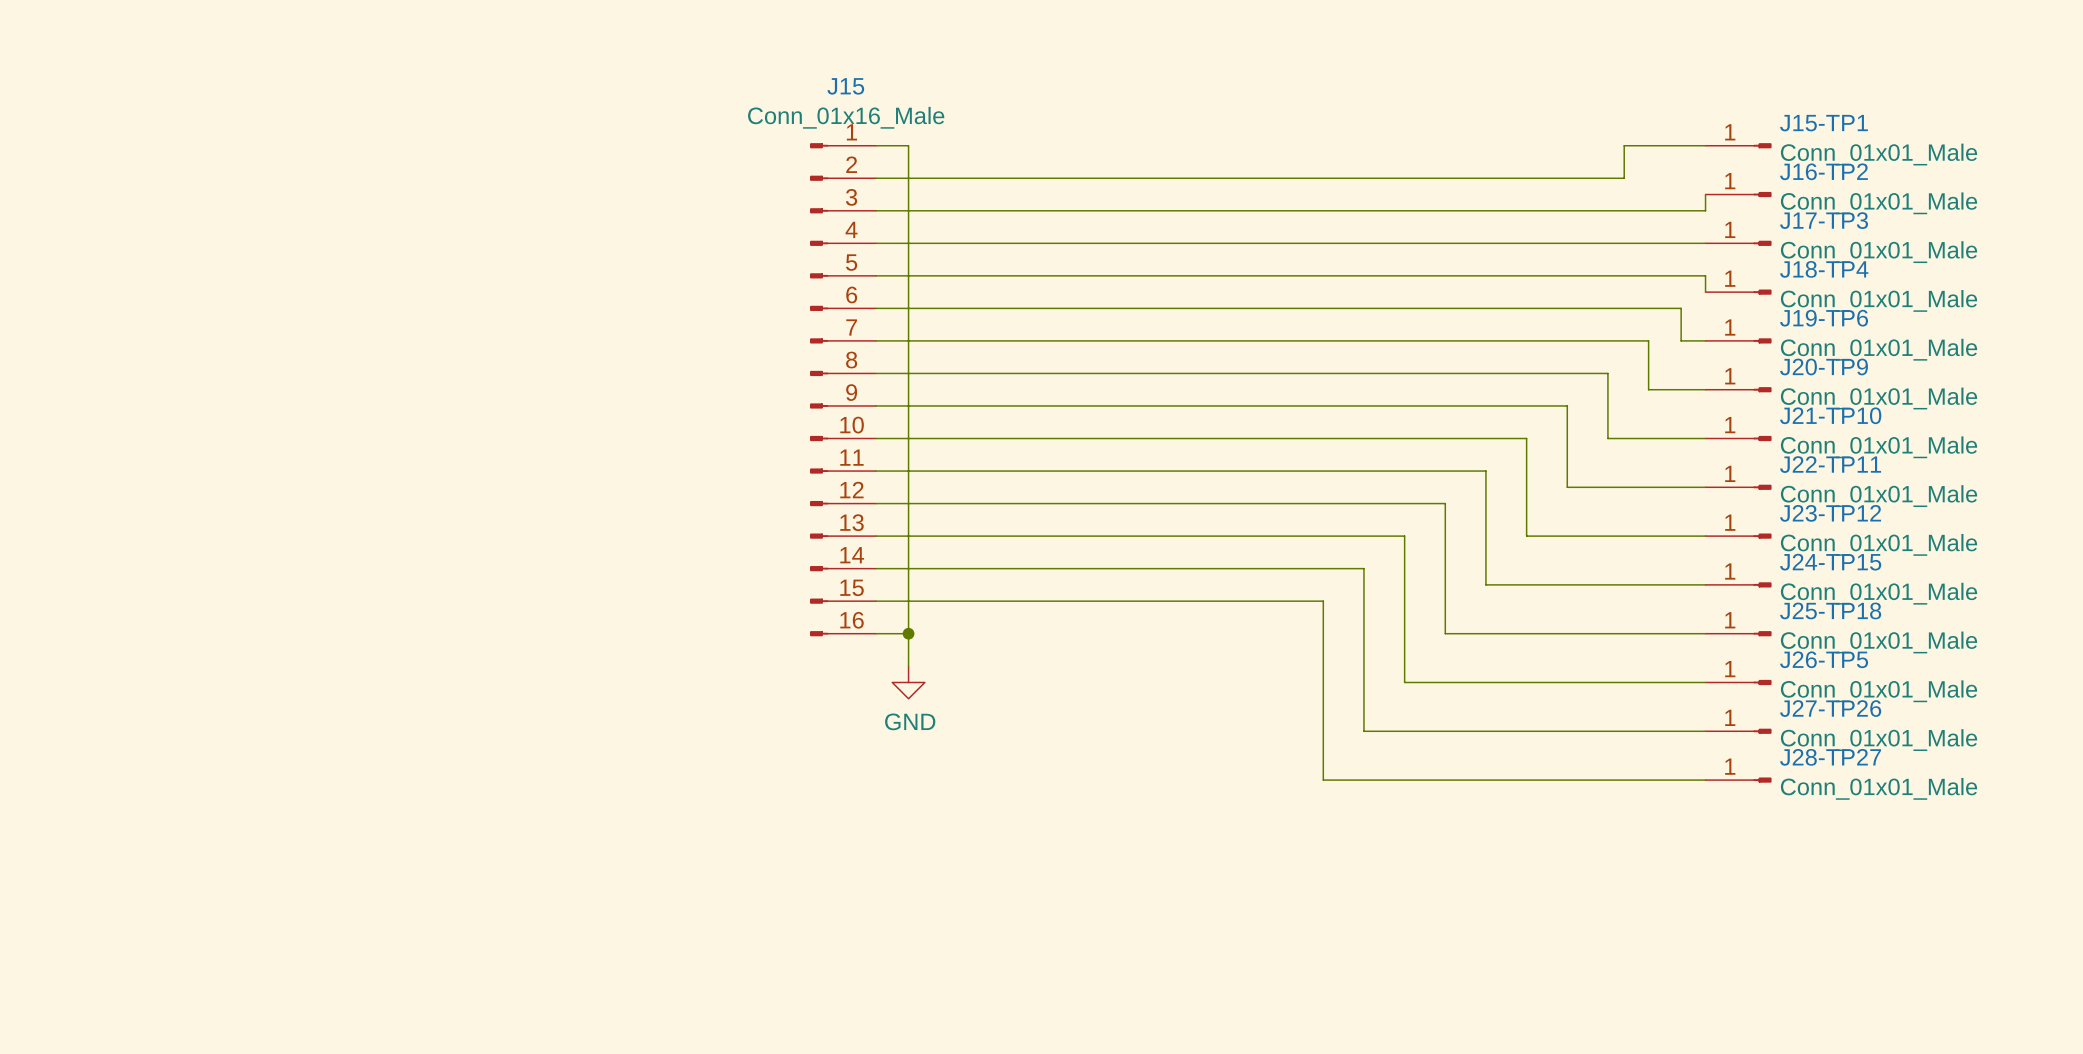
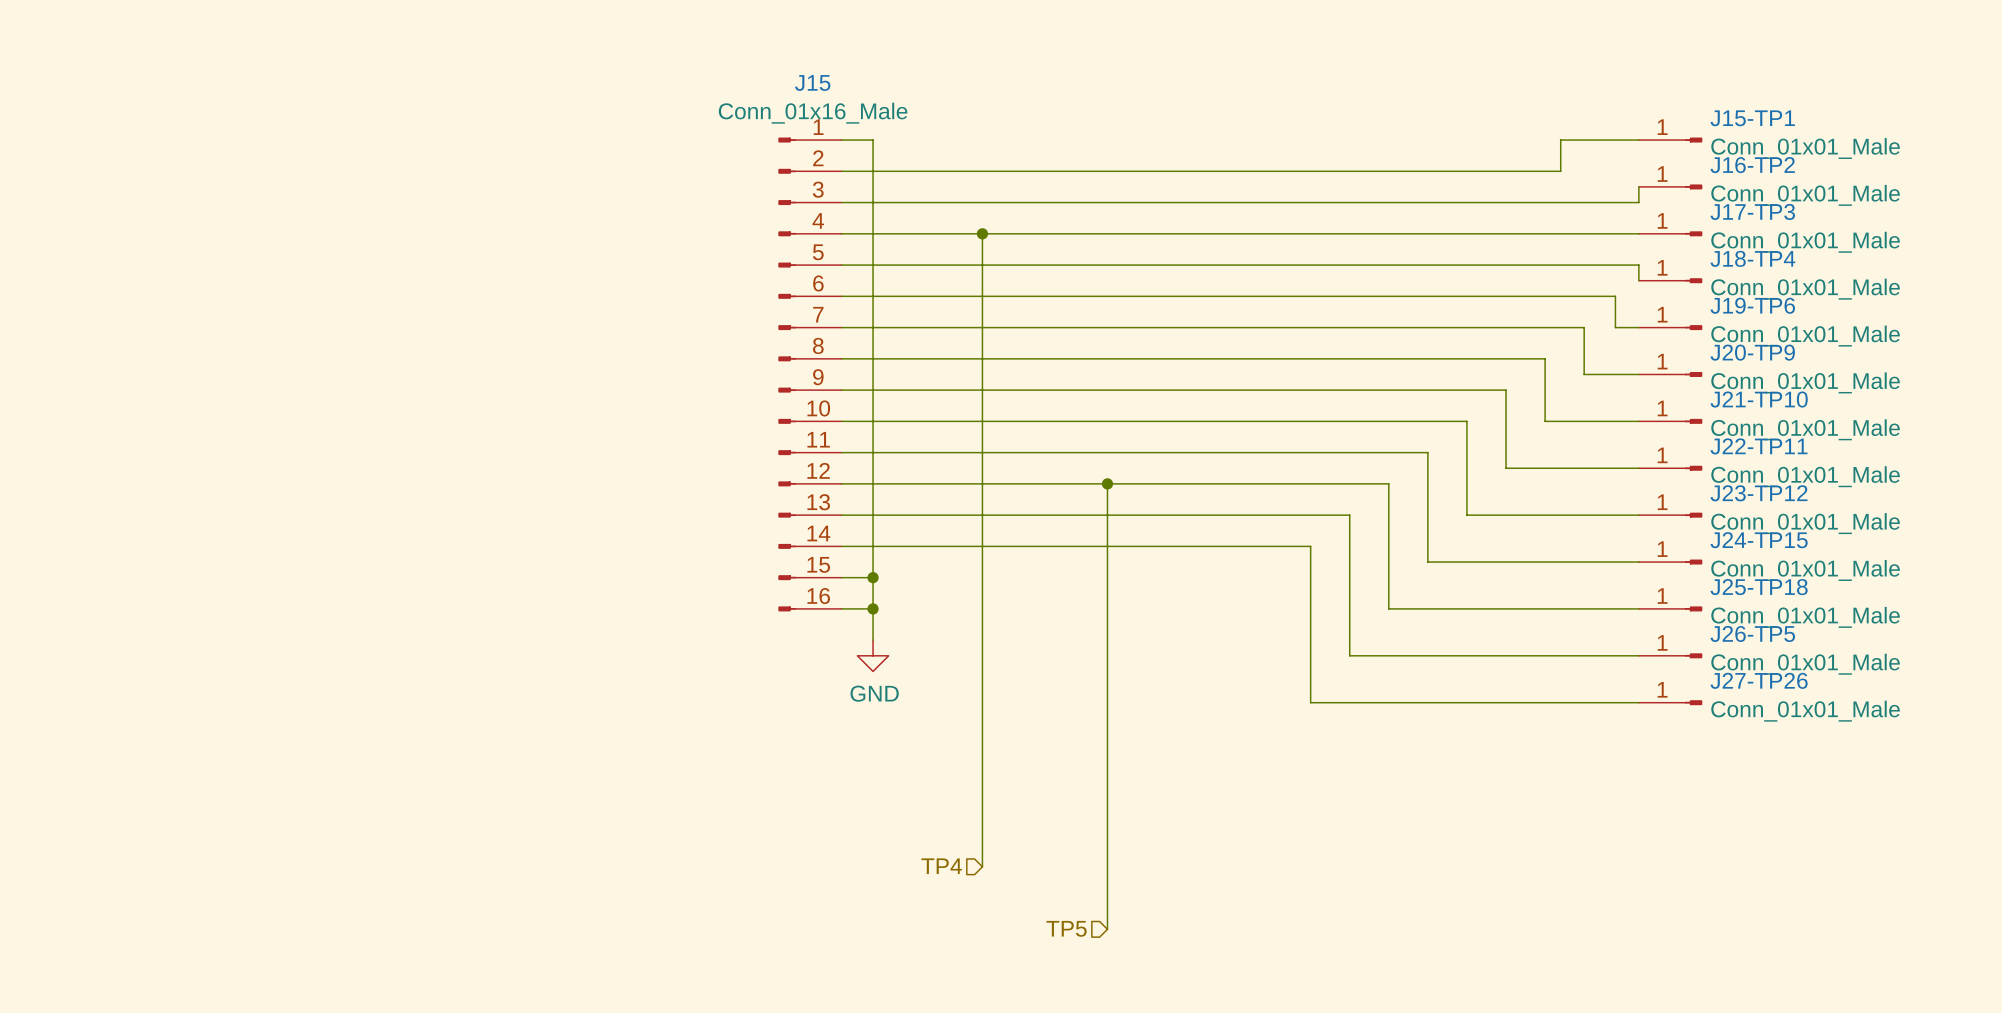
wire: none -> (982, 233) (982, 866)
junction: none -> (982, 233)
wire: none -> (1107, 483) (1107, 929)
junction: none -> (1107, 483)
wire: (908, 601) (1323, 601) (1323, 780) (1705, 780) -> none
junction: none -> (873, 577)
J28-TP27: Conn_01x01_Male (1738, 780) -> none
hierarchical label: none -> TP4 (941, 866)
hierarchical label: none -> TP5 (1066, 928)

